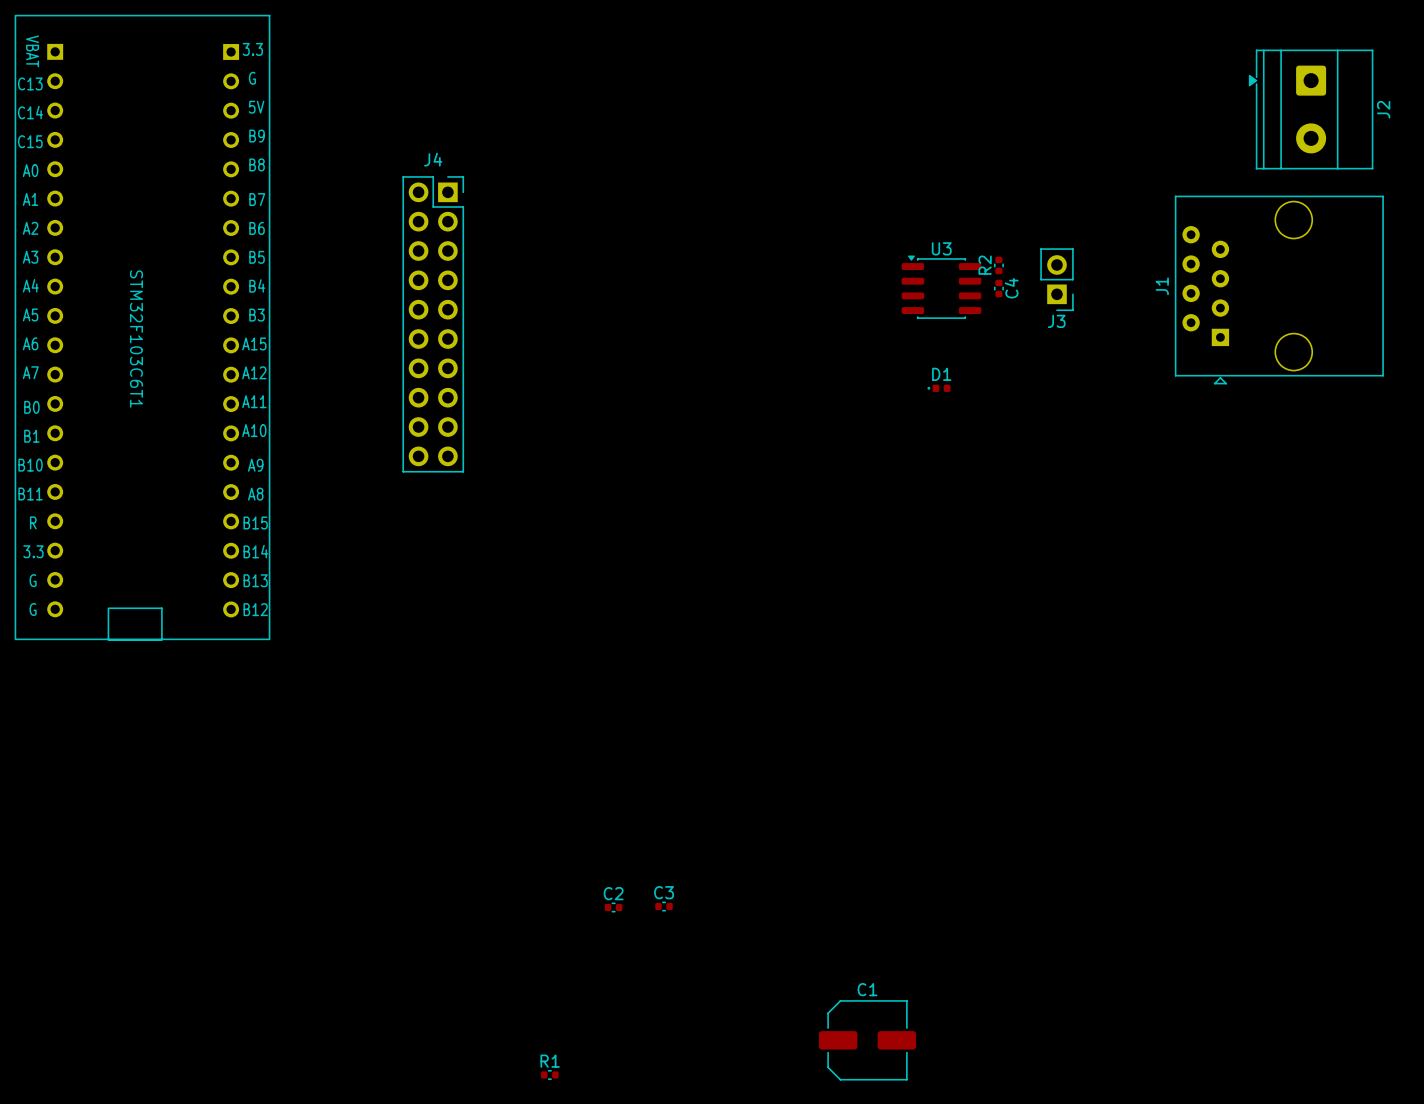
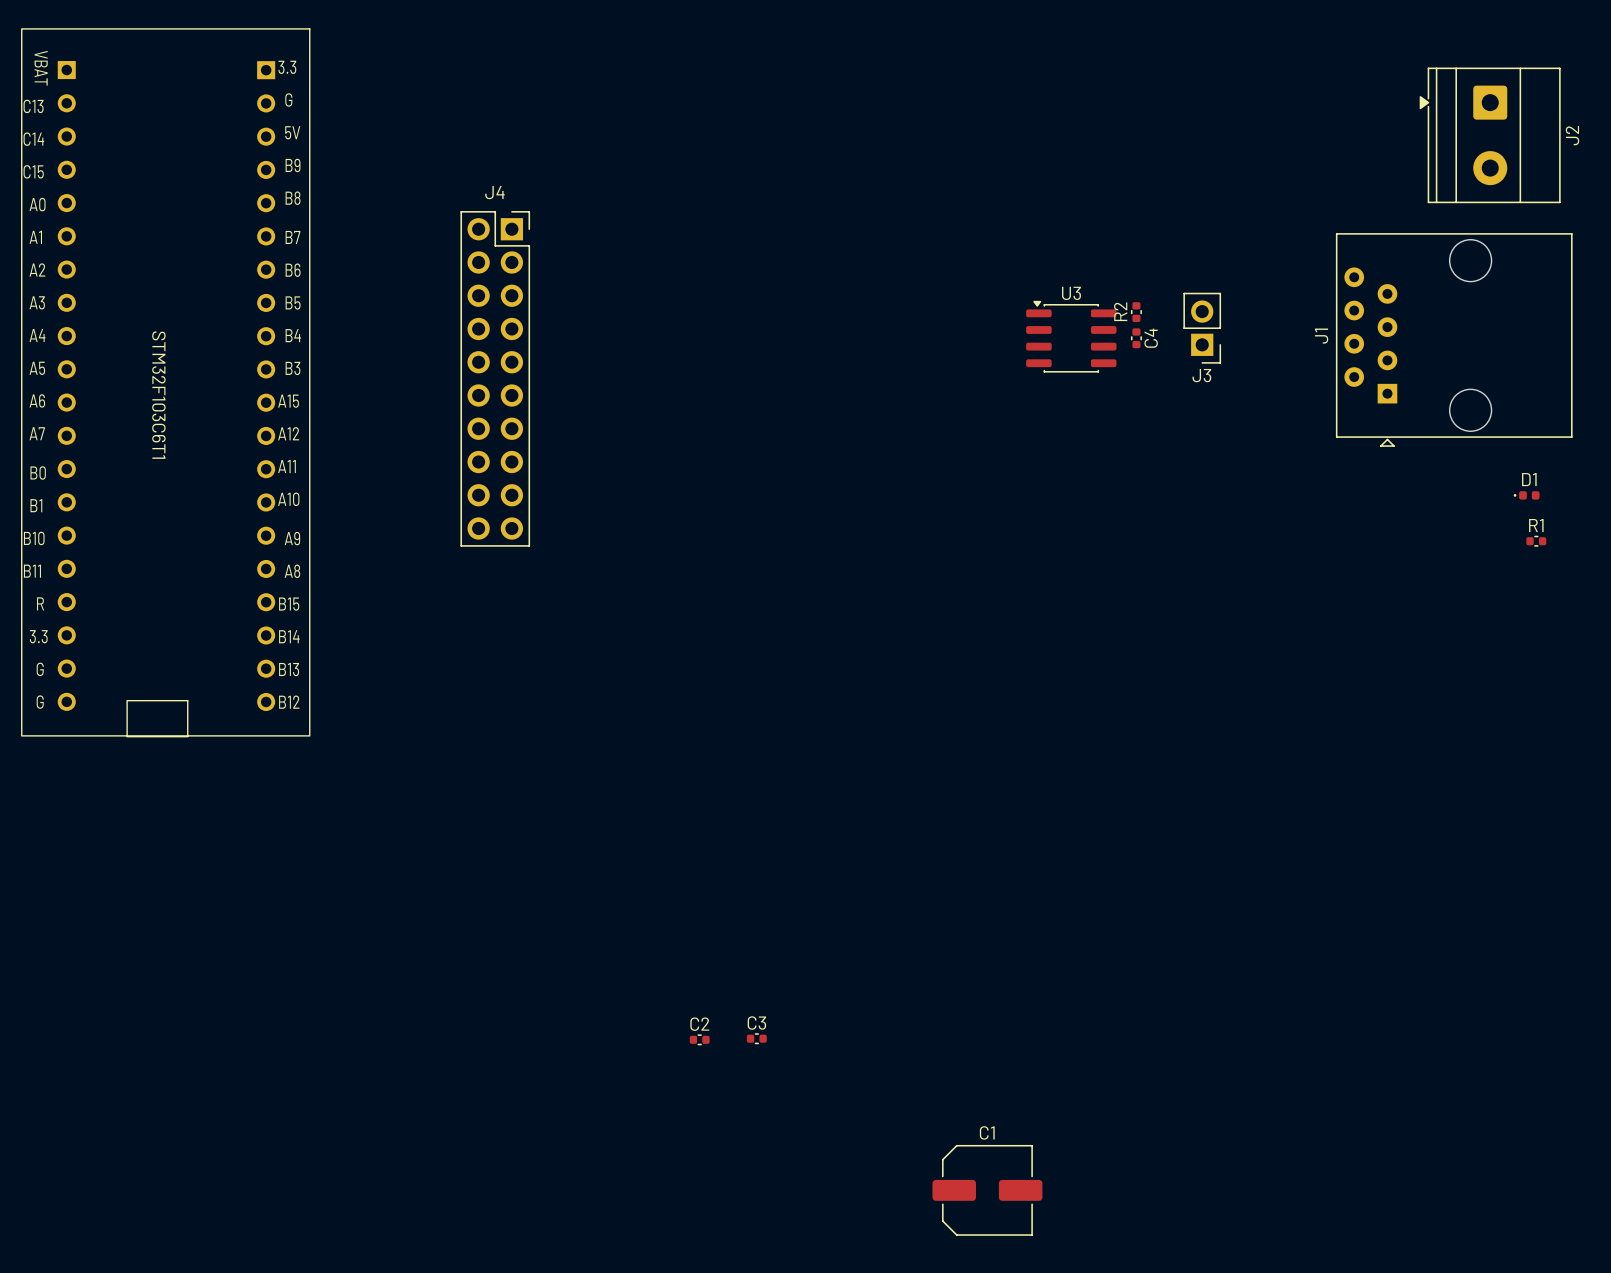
D1 position: (939, 388) -> (1526, 495)
R1 position: (549, 1074) -> (1536, 541)

